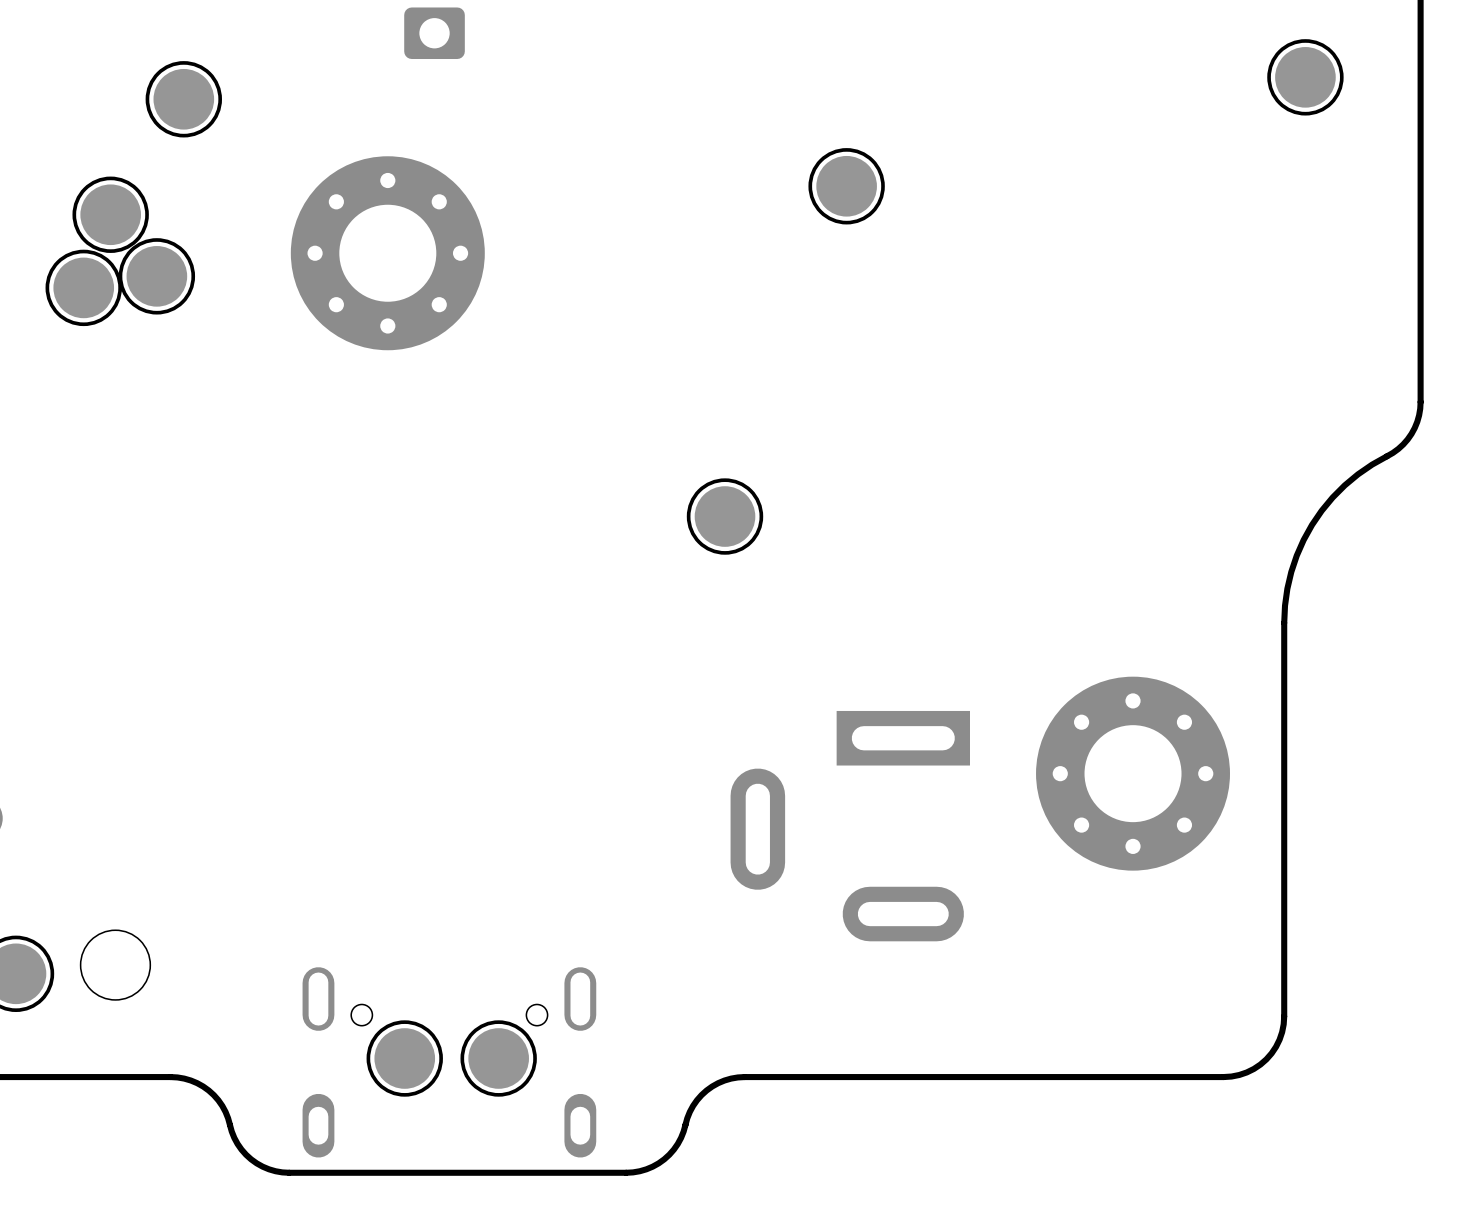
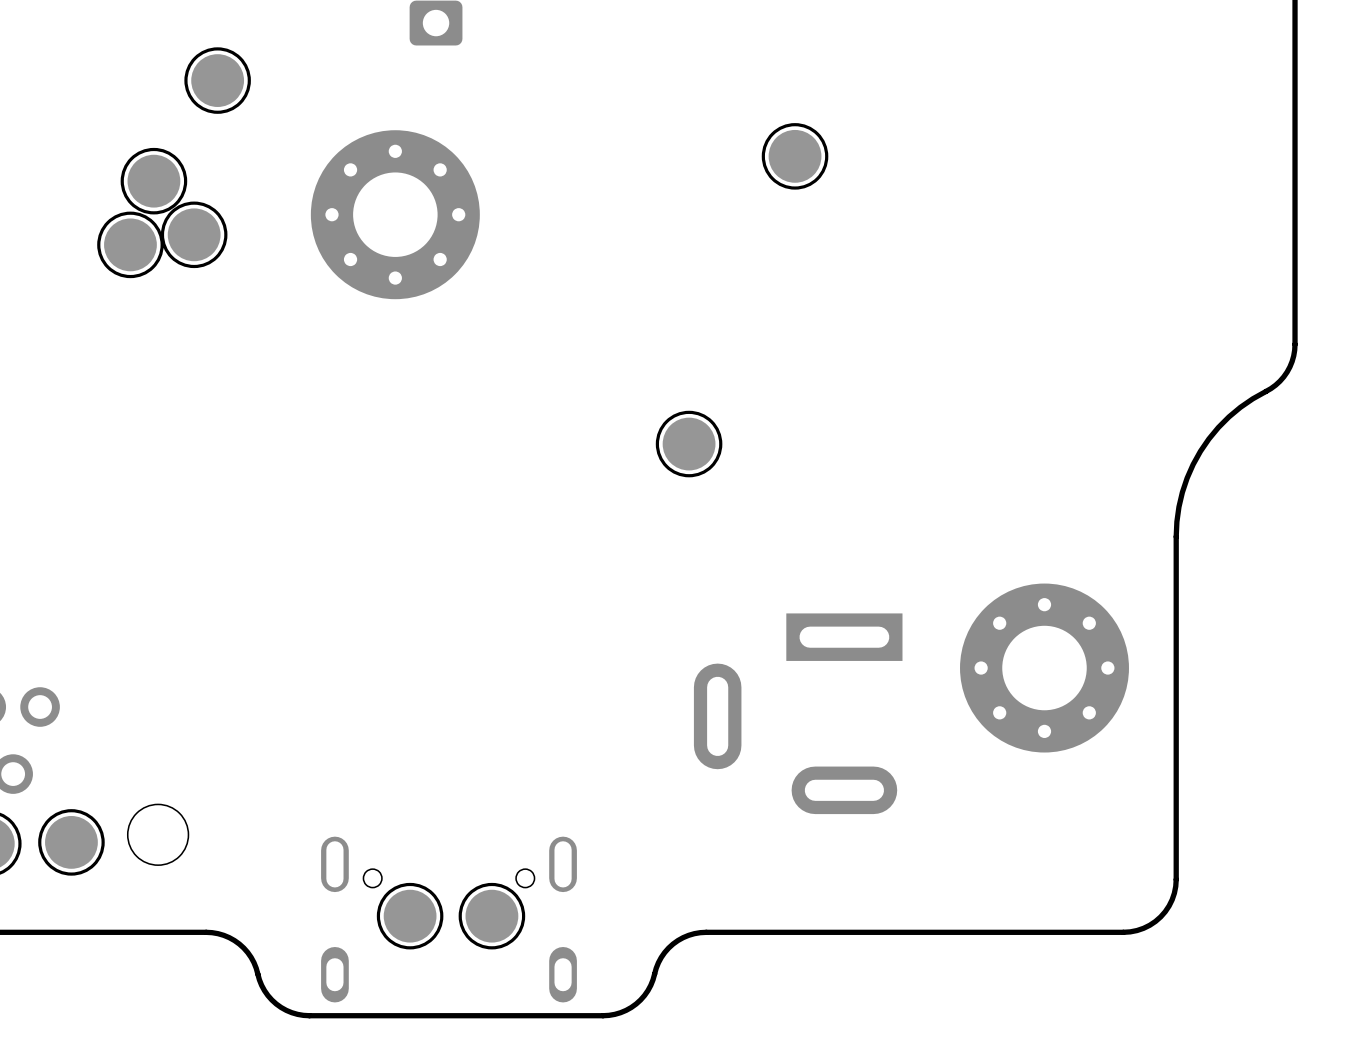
part: (1305, 77) -> none

